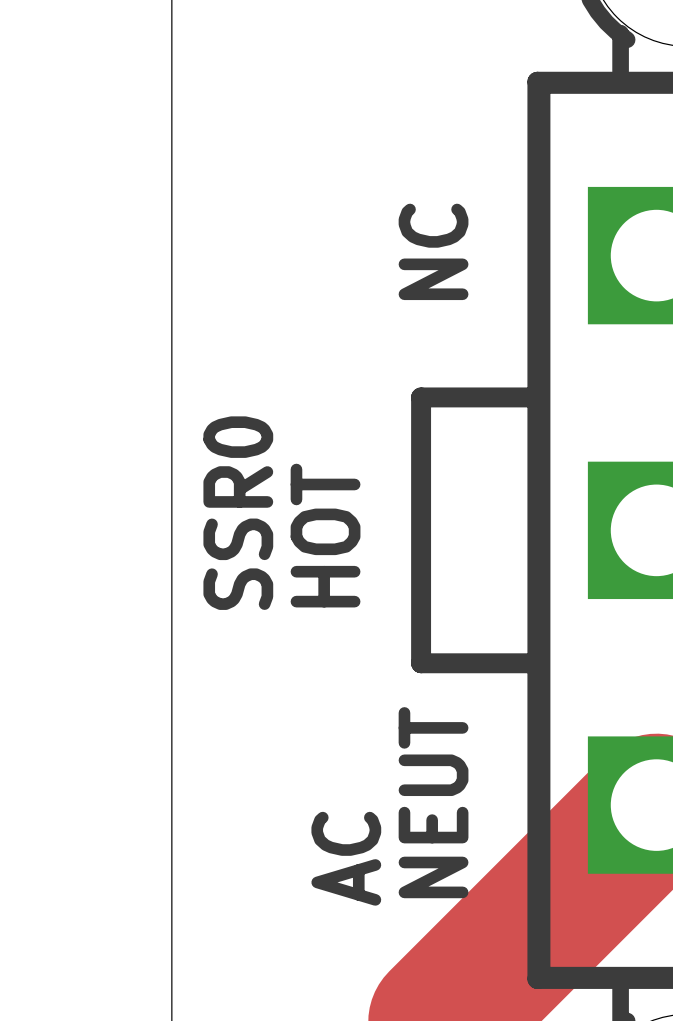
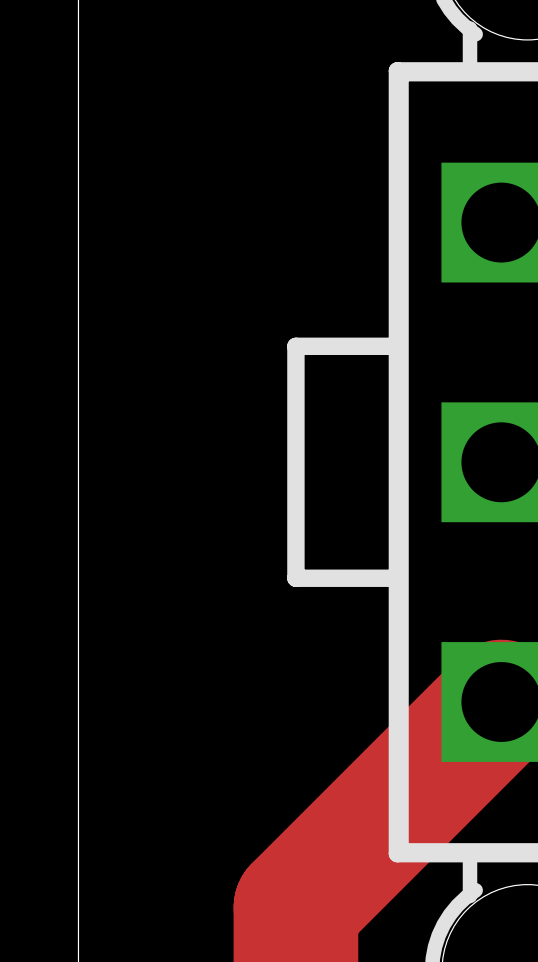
text: NC (433, 251) -> none
text: SSR0 (238, 513) -> none
text: HOT (325, 535) -> none
text: NEUT (433, 802) -> none
text: AC (346, 858) -> none

